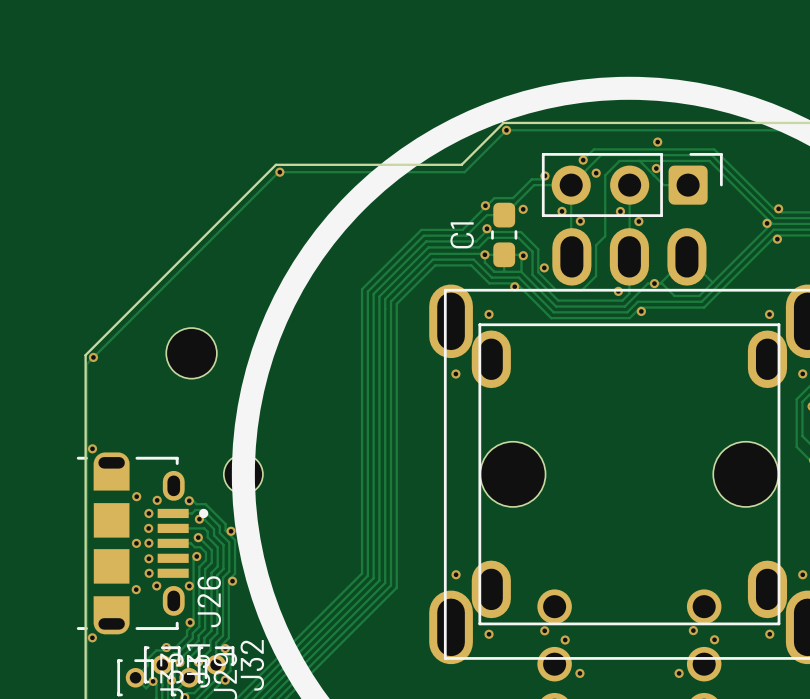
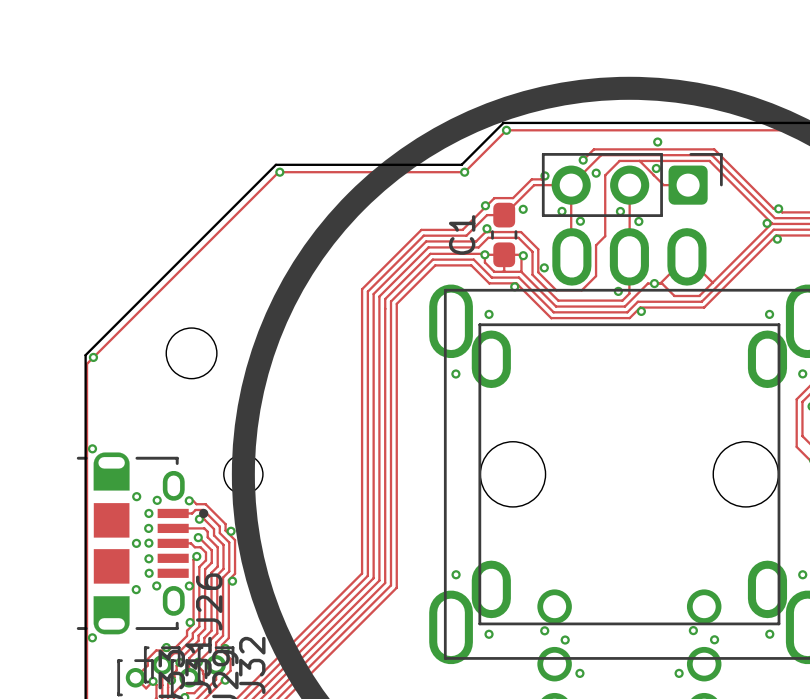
via: none -> (464, 172)

